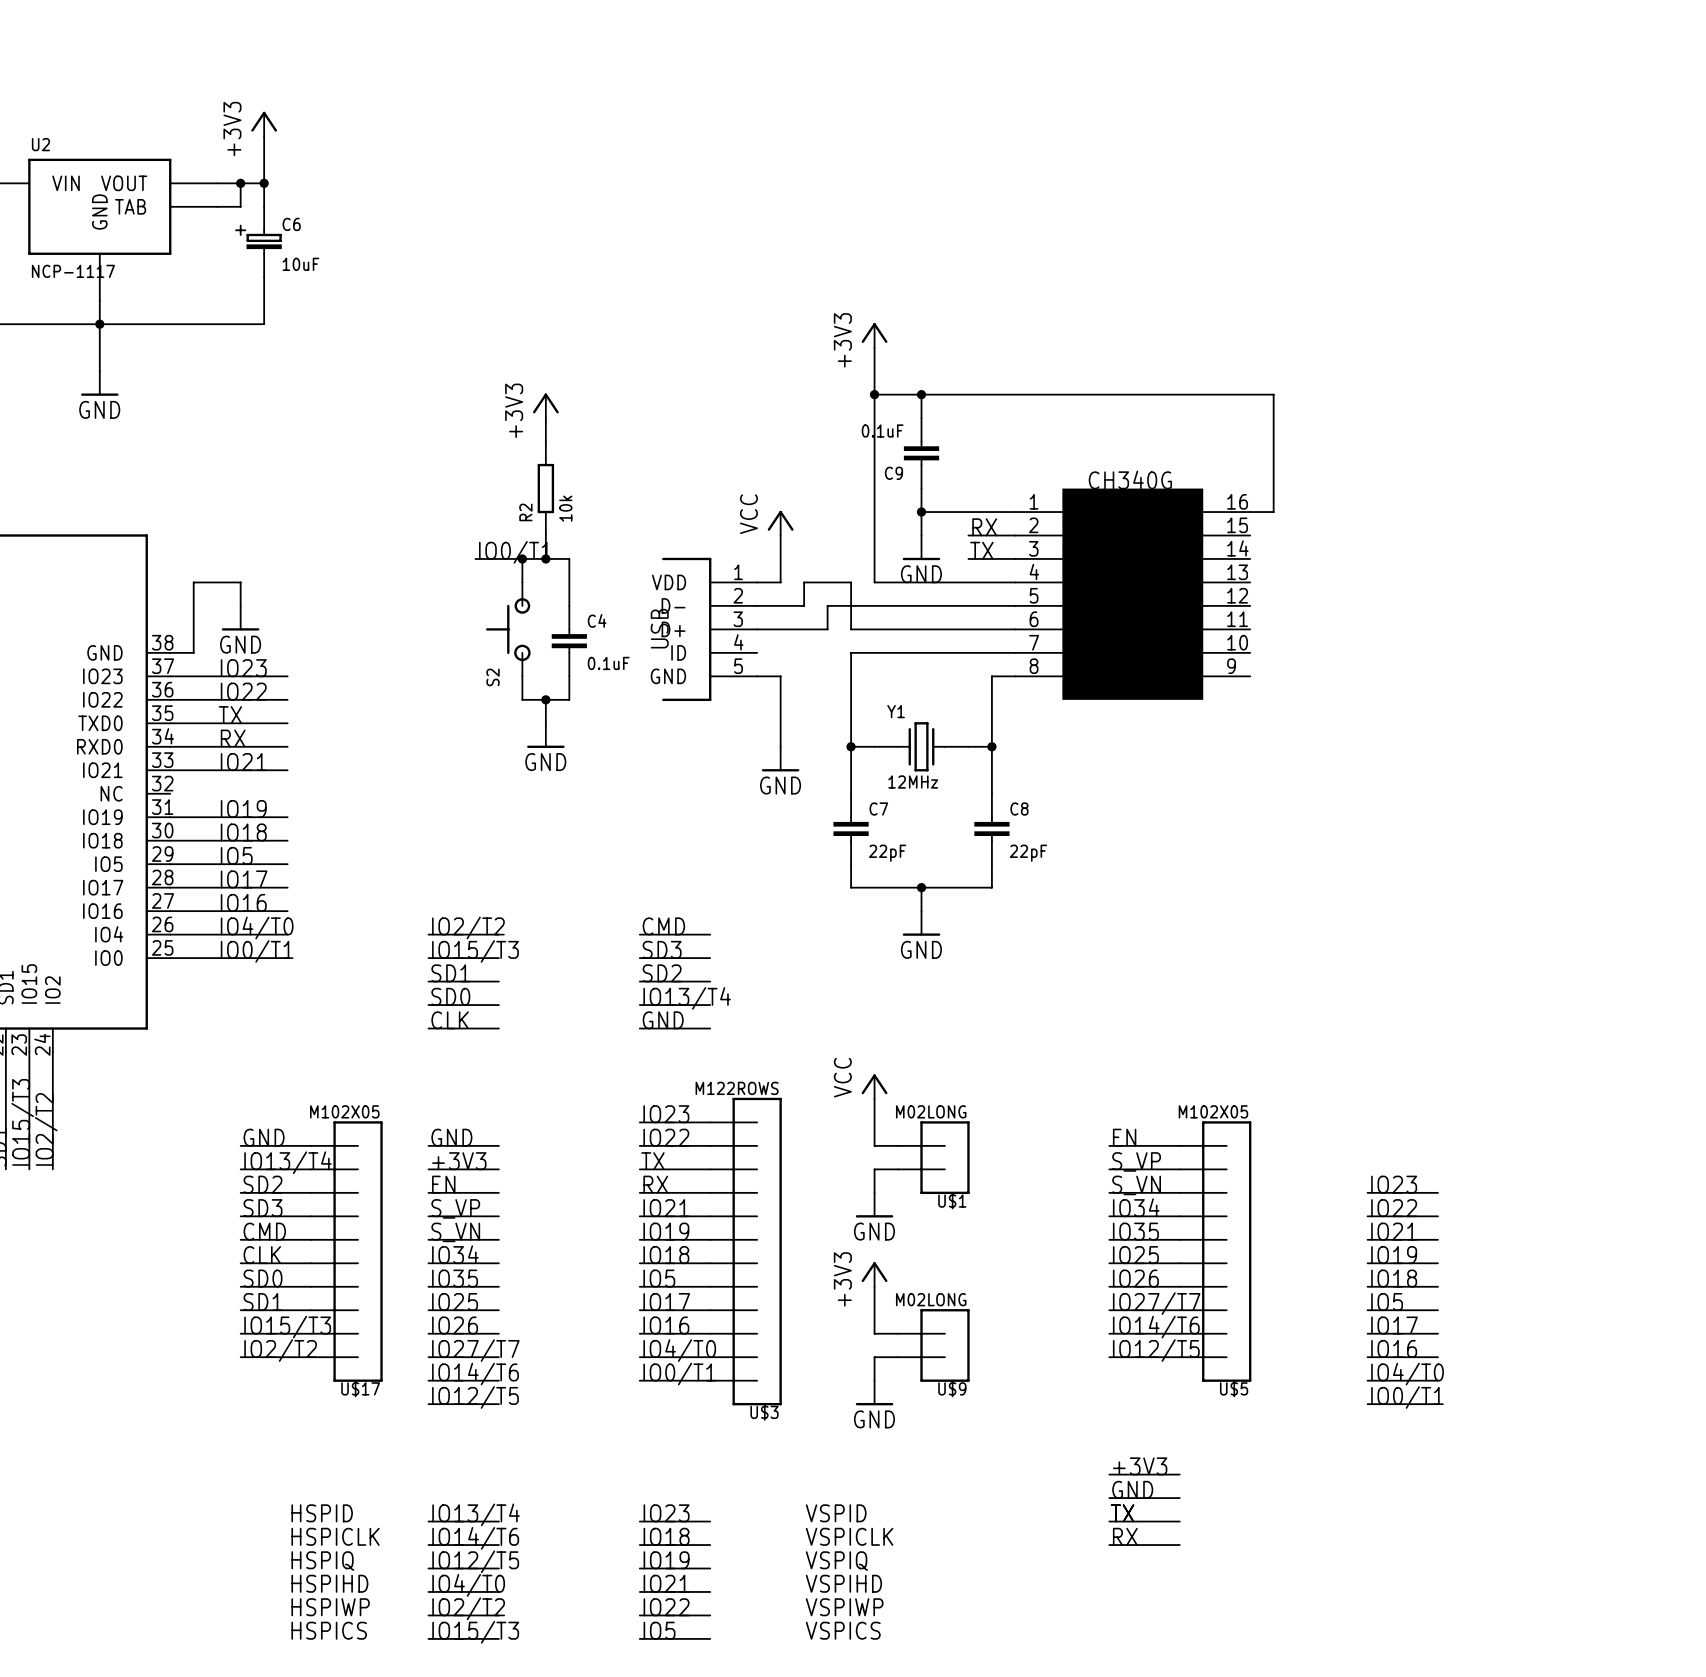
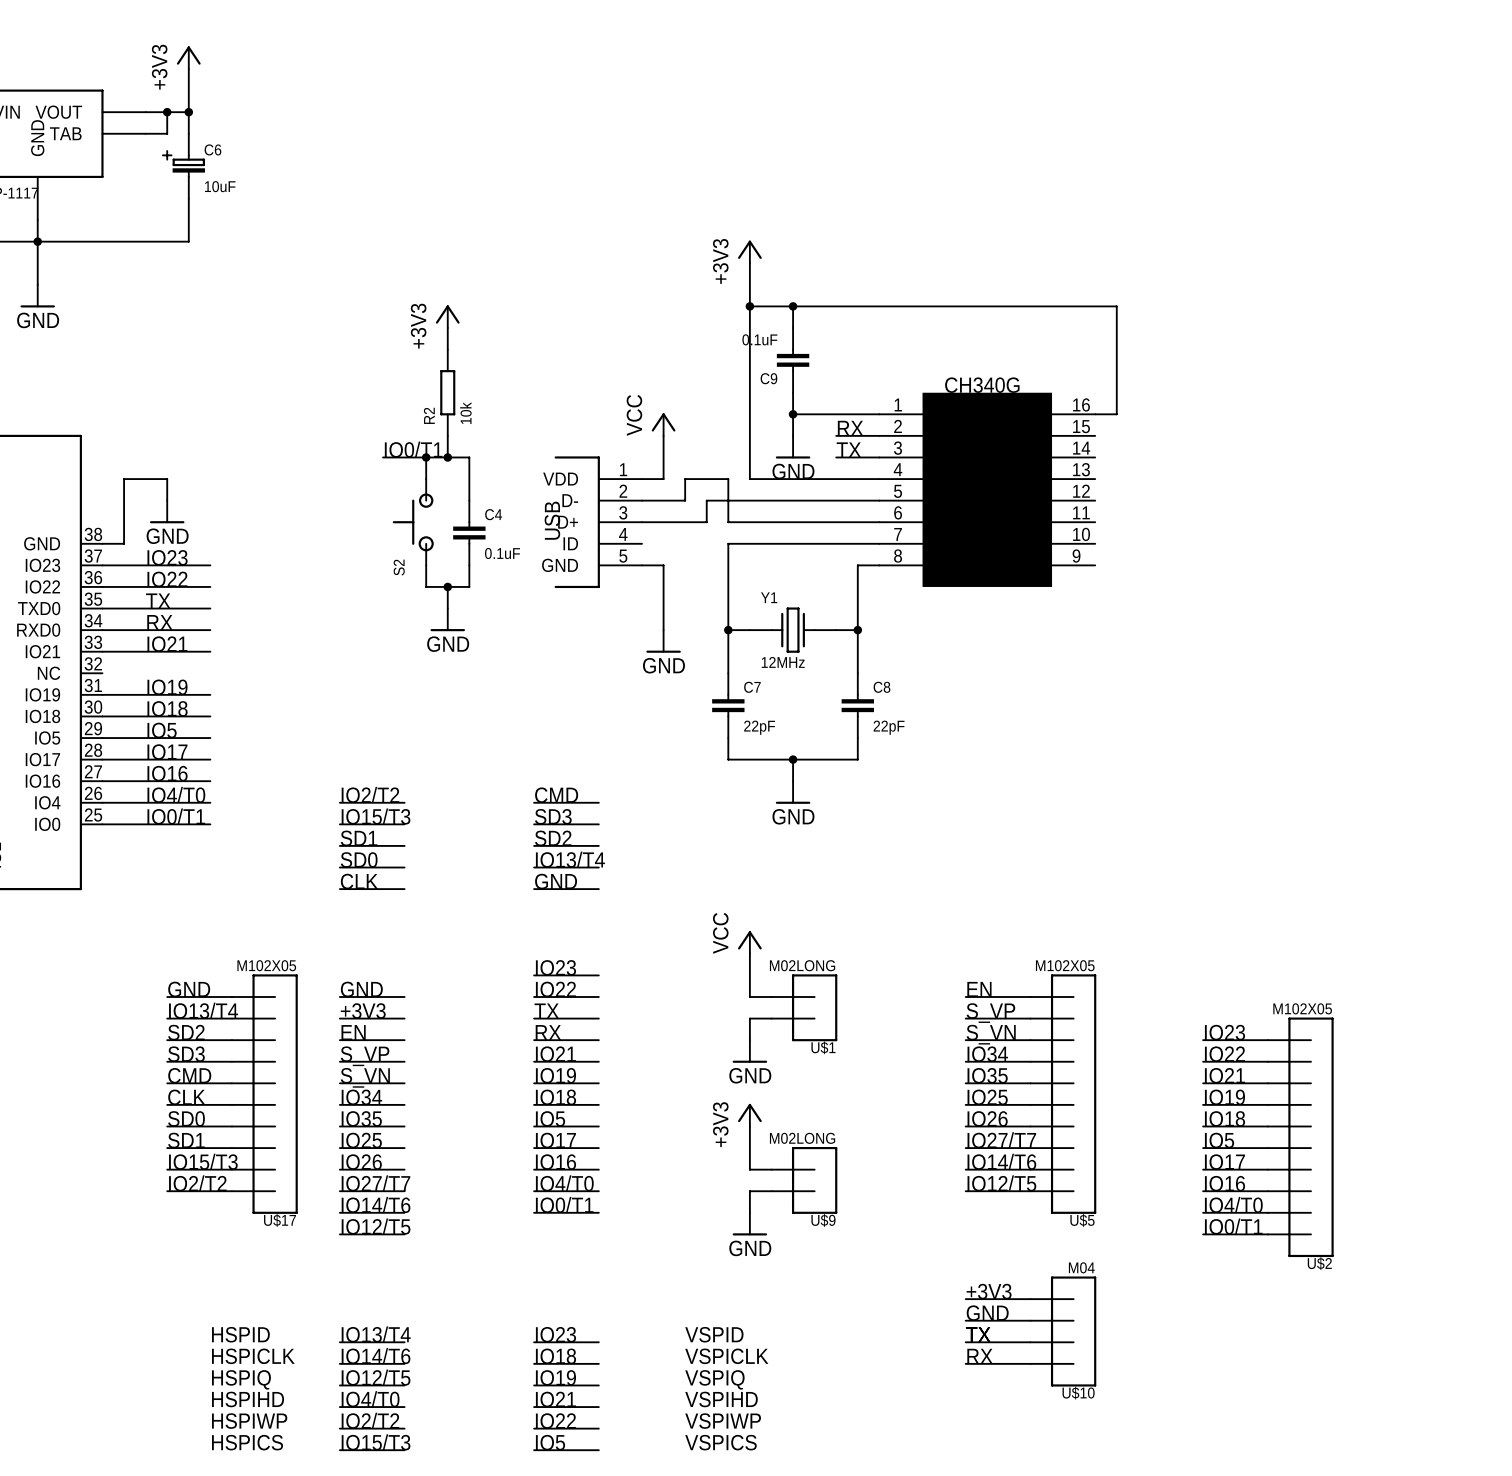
U$3: M122ROWS (746, 1251) -> none
U$2: none -> M102X05 (1300, 1137)
U$10: none -> M04 (1063, 1331)

